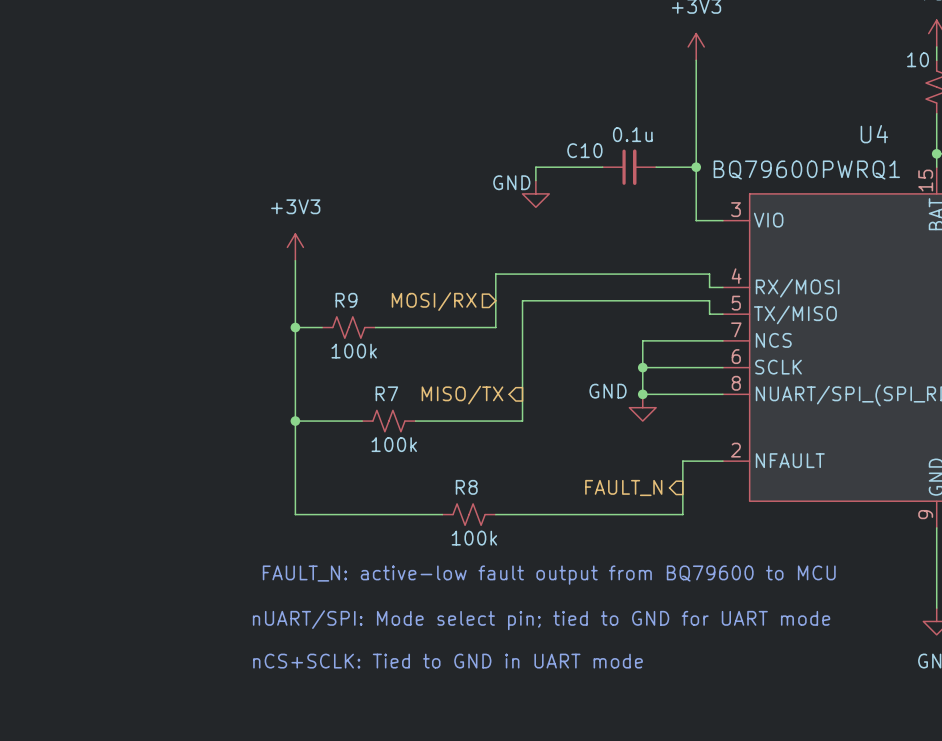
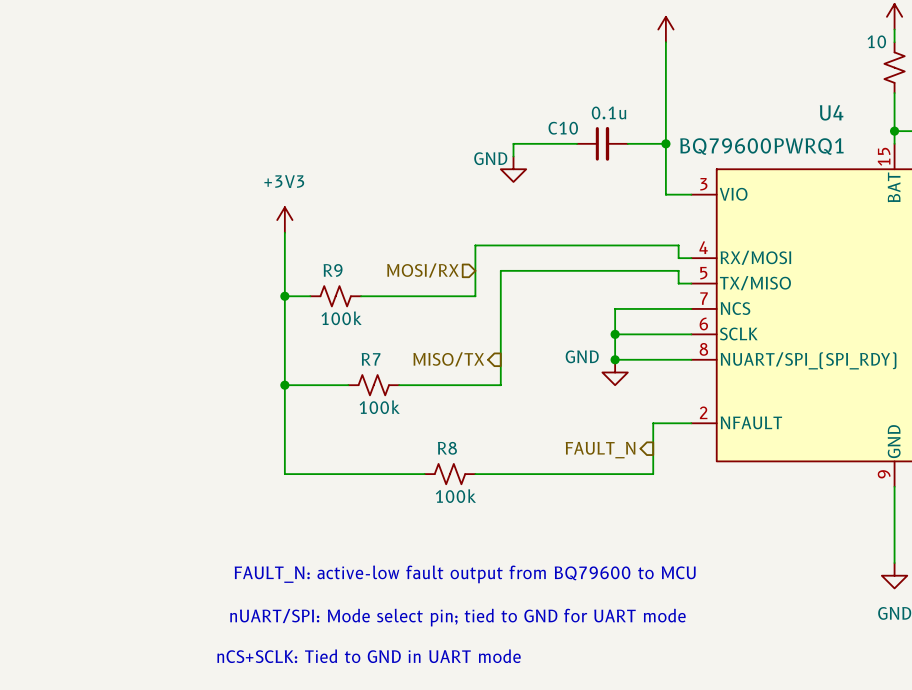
text position: FAULT_N: active-low fault output from BQ79600 to MCU (549, 575) -> FAULT_N: active-low fault output from BQ79600 to MCU (465, 574)
text position: nUART/SPI: Mode select pin; tied to GND for UART mode (541, 620) -> nUART/SPI: Mode select pin; tied to GND for UART mode (457, 617)
text position: nCS+SCLK: Tied to GND in UART mode (448, 661) -> nCS+SCLK: Tied to GND in UART mode (369, 656)

